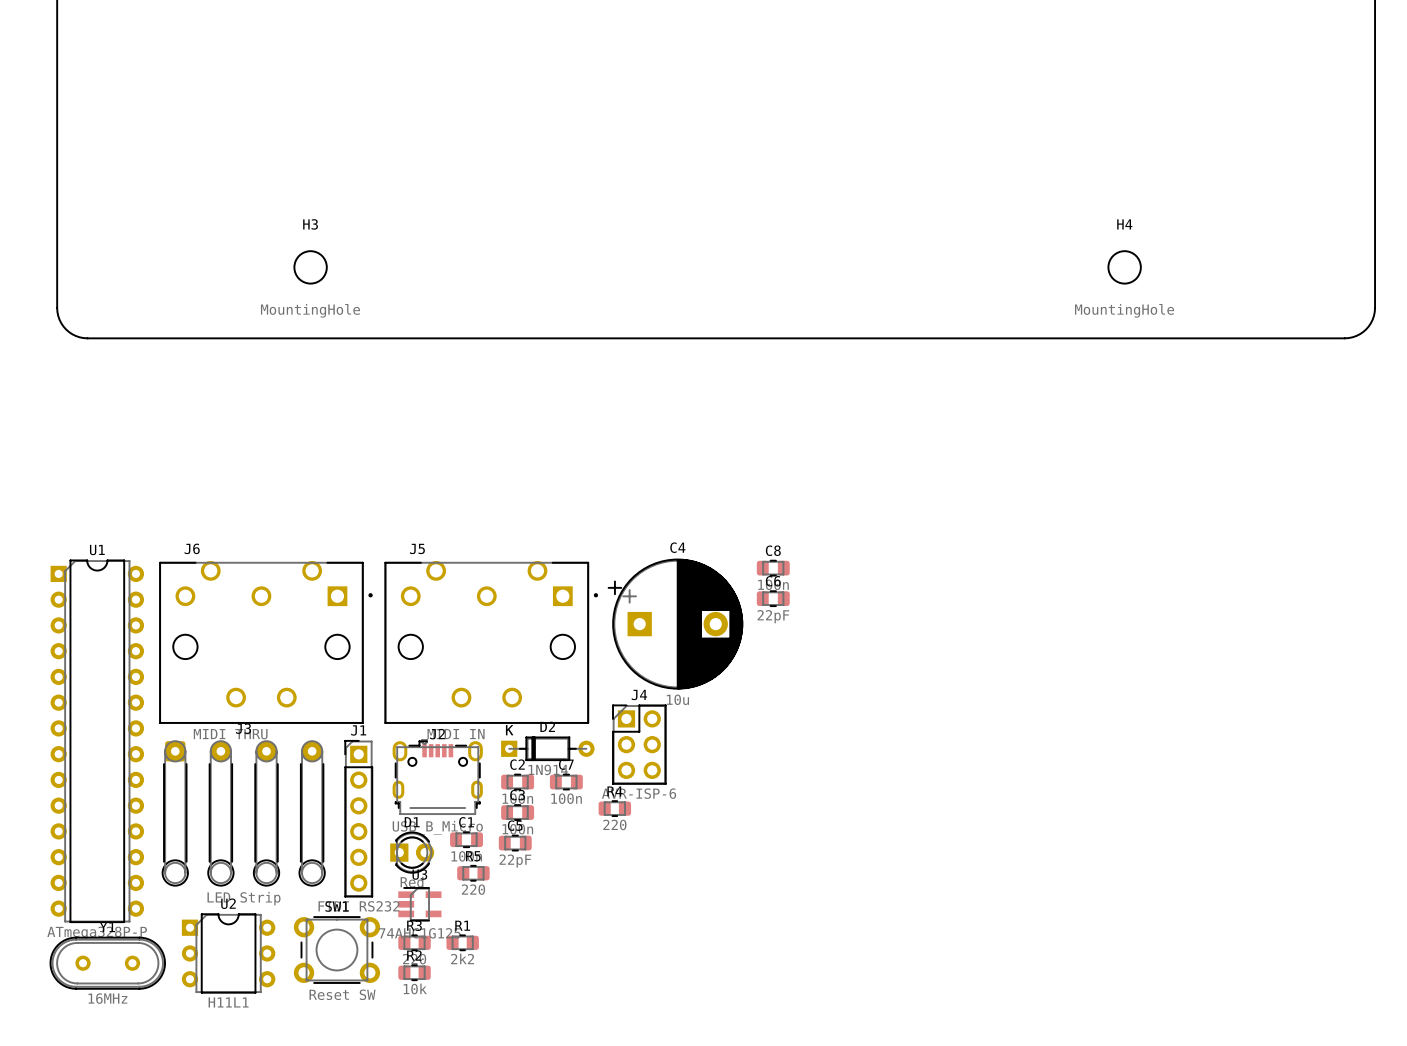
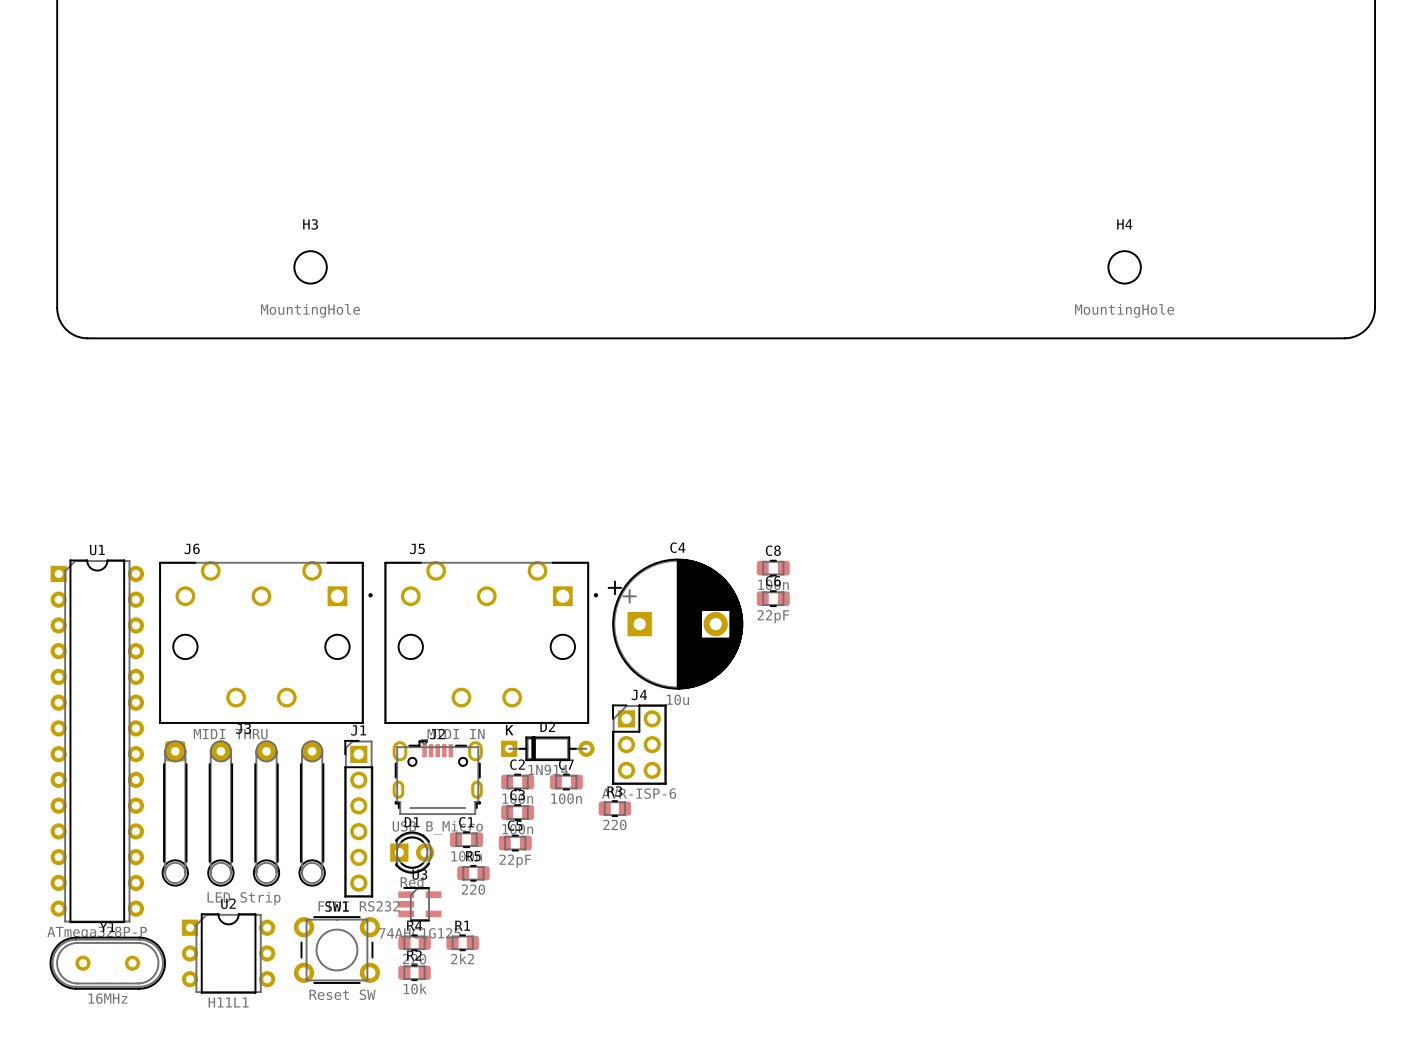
R4 name: R4 (614, 791) -> R3 (614, 791)
R3 name: R3 (414, 925) -> R4 (414, 925)

